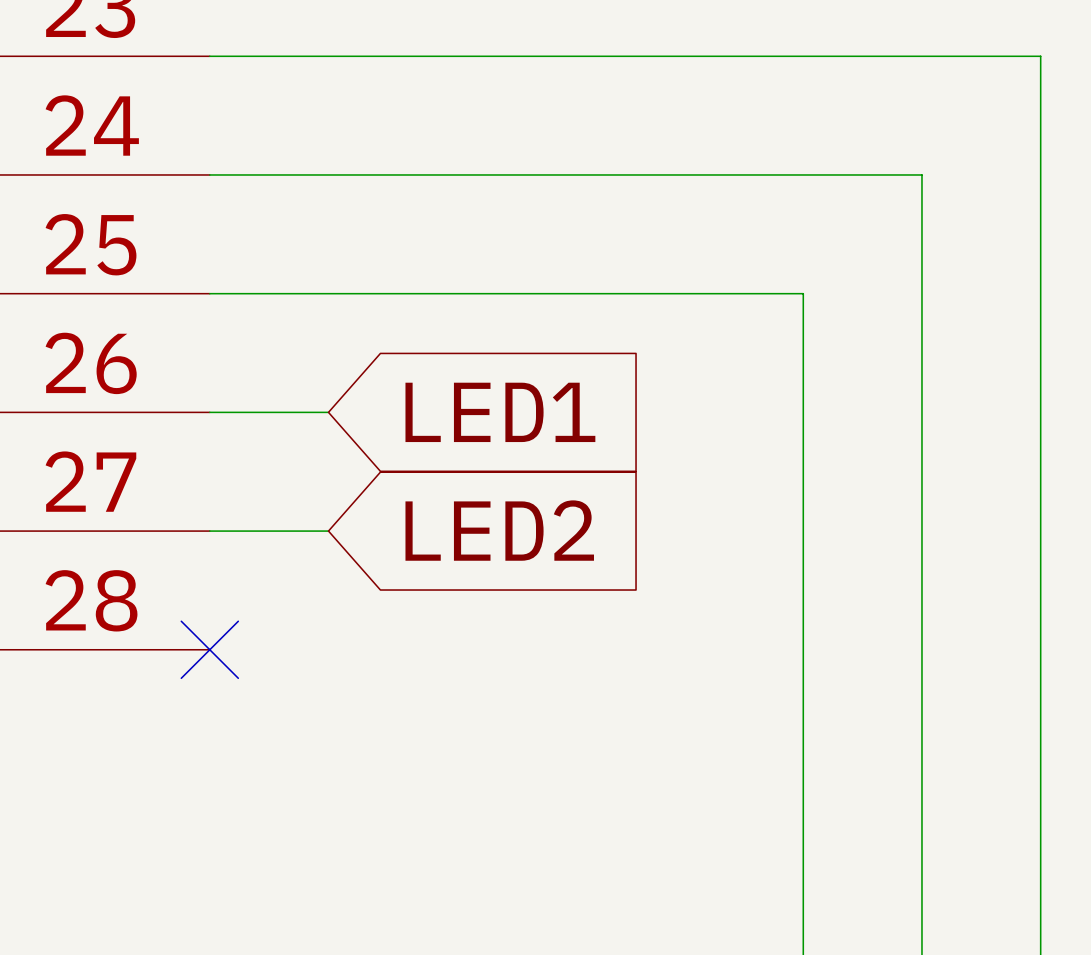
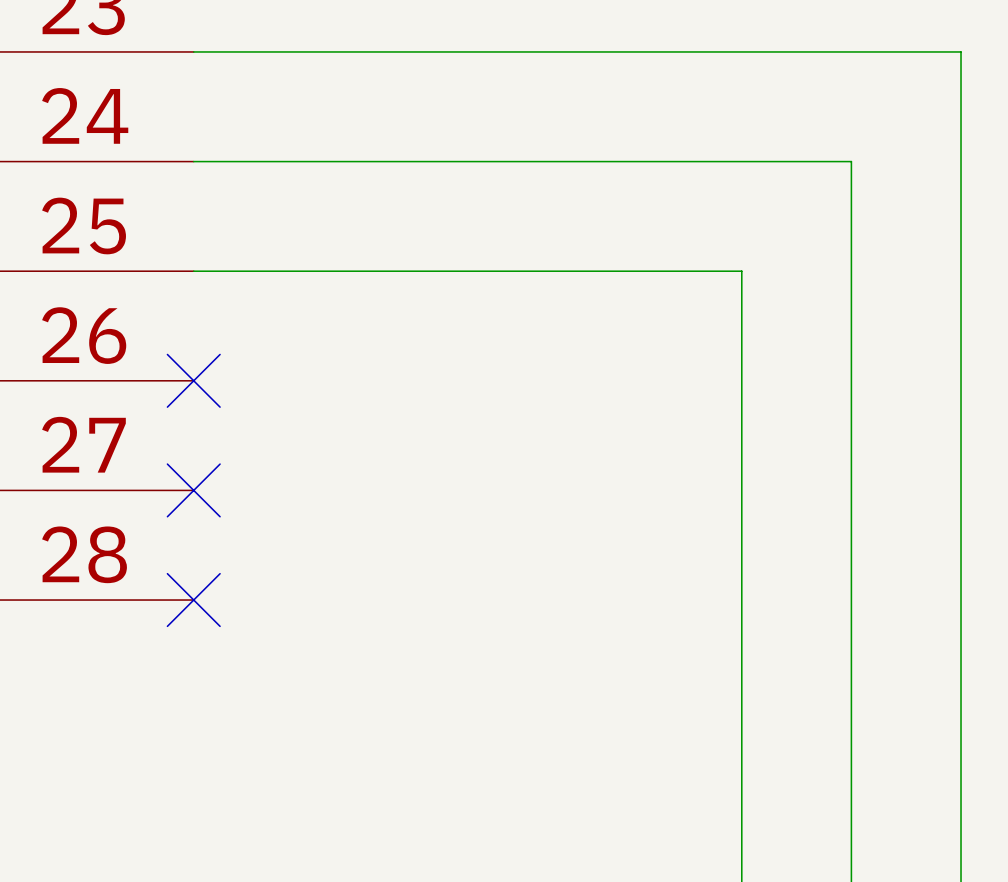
wire: (209, 412) (328, 412) -> none
no-connect mark: none -> (193, 380)
global label: LED1 (500, 412) -> none
global label: LED2 (499, 530) -> none
wire: (209, 531) (328, 531) -> none
no-connect mark: none -> (193, 490)

